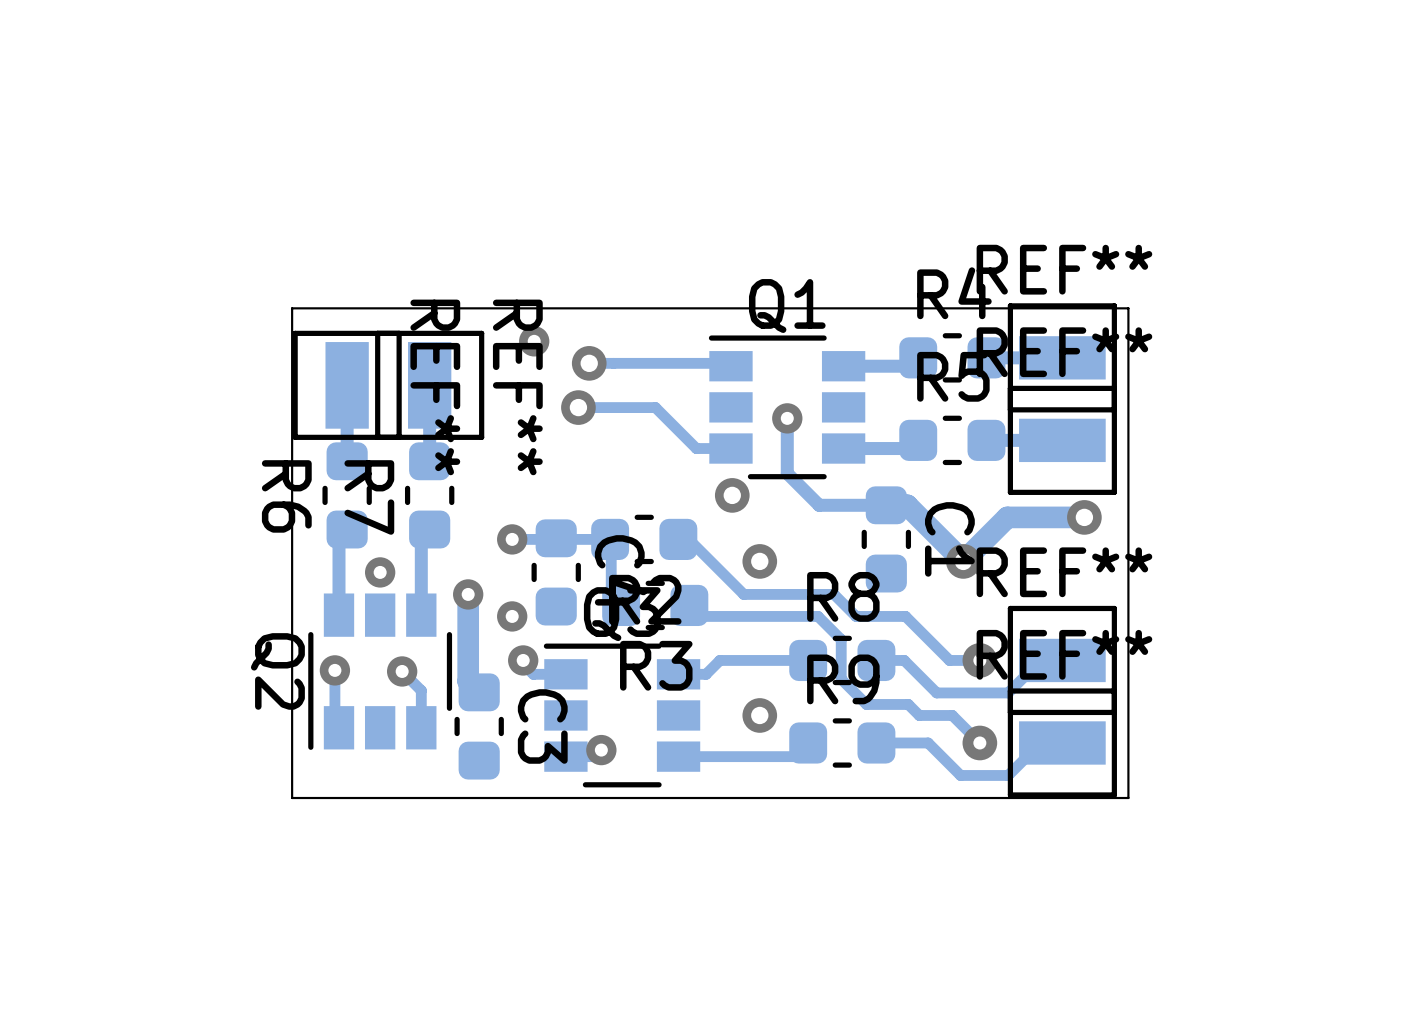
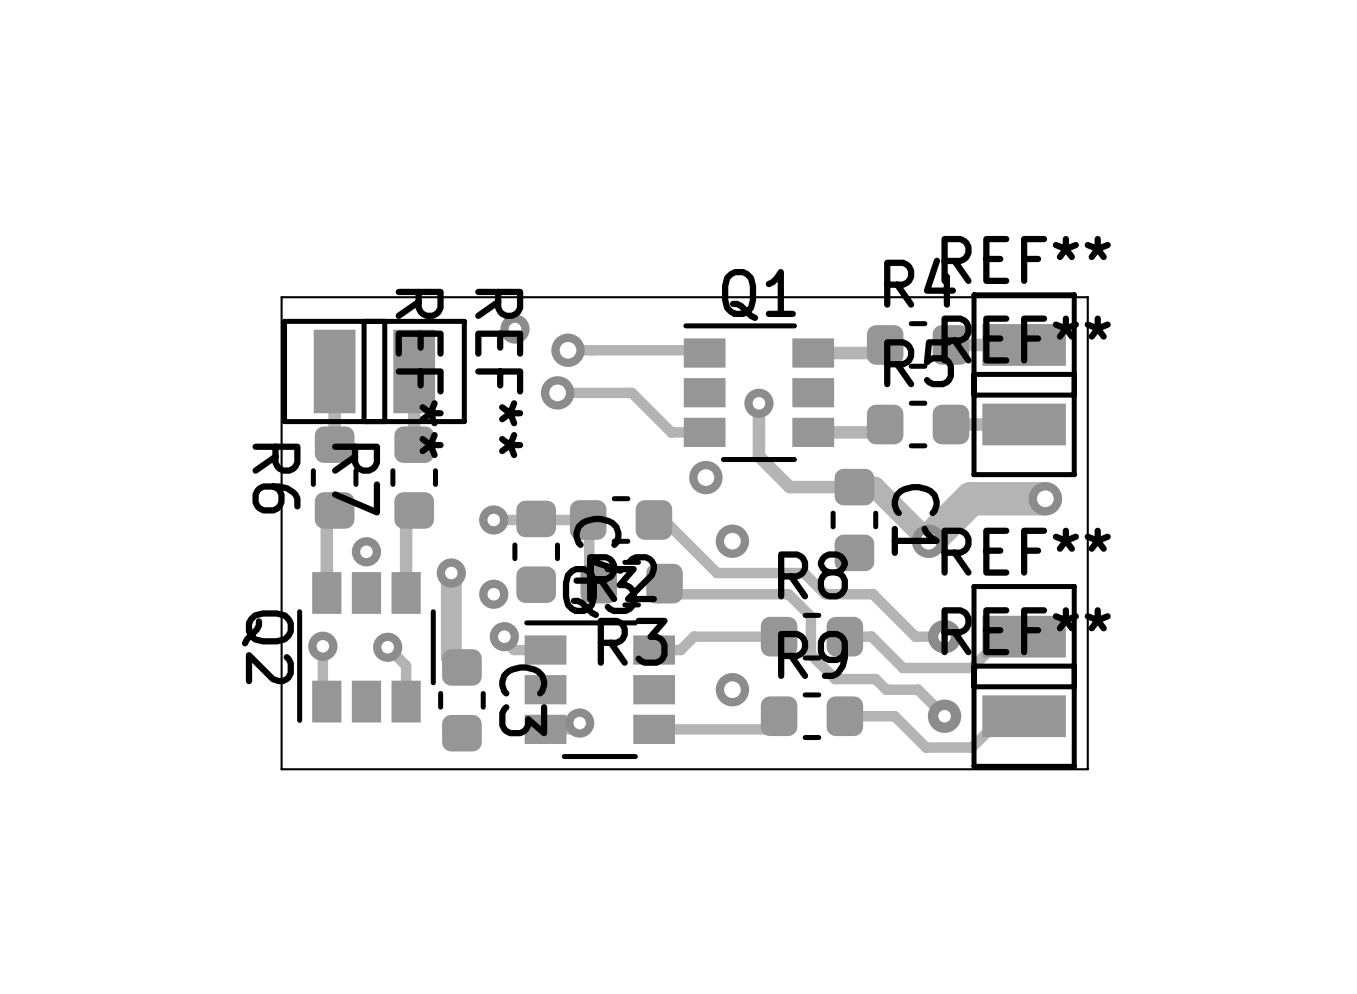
track width: thin (1084, 517) (1007, 517) (963, 561) -> thick (1045, 498) (971, 498) (928, 541)

